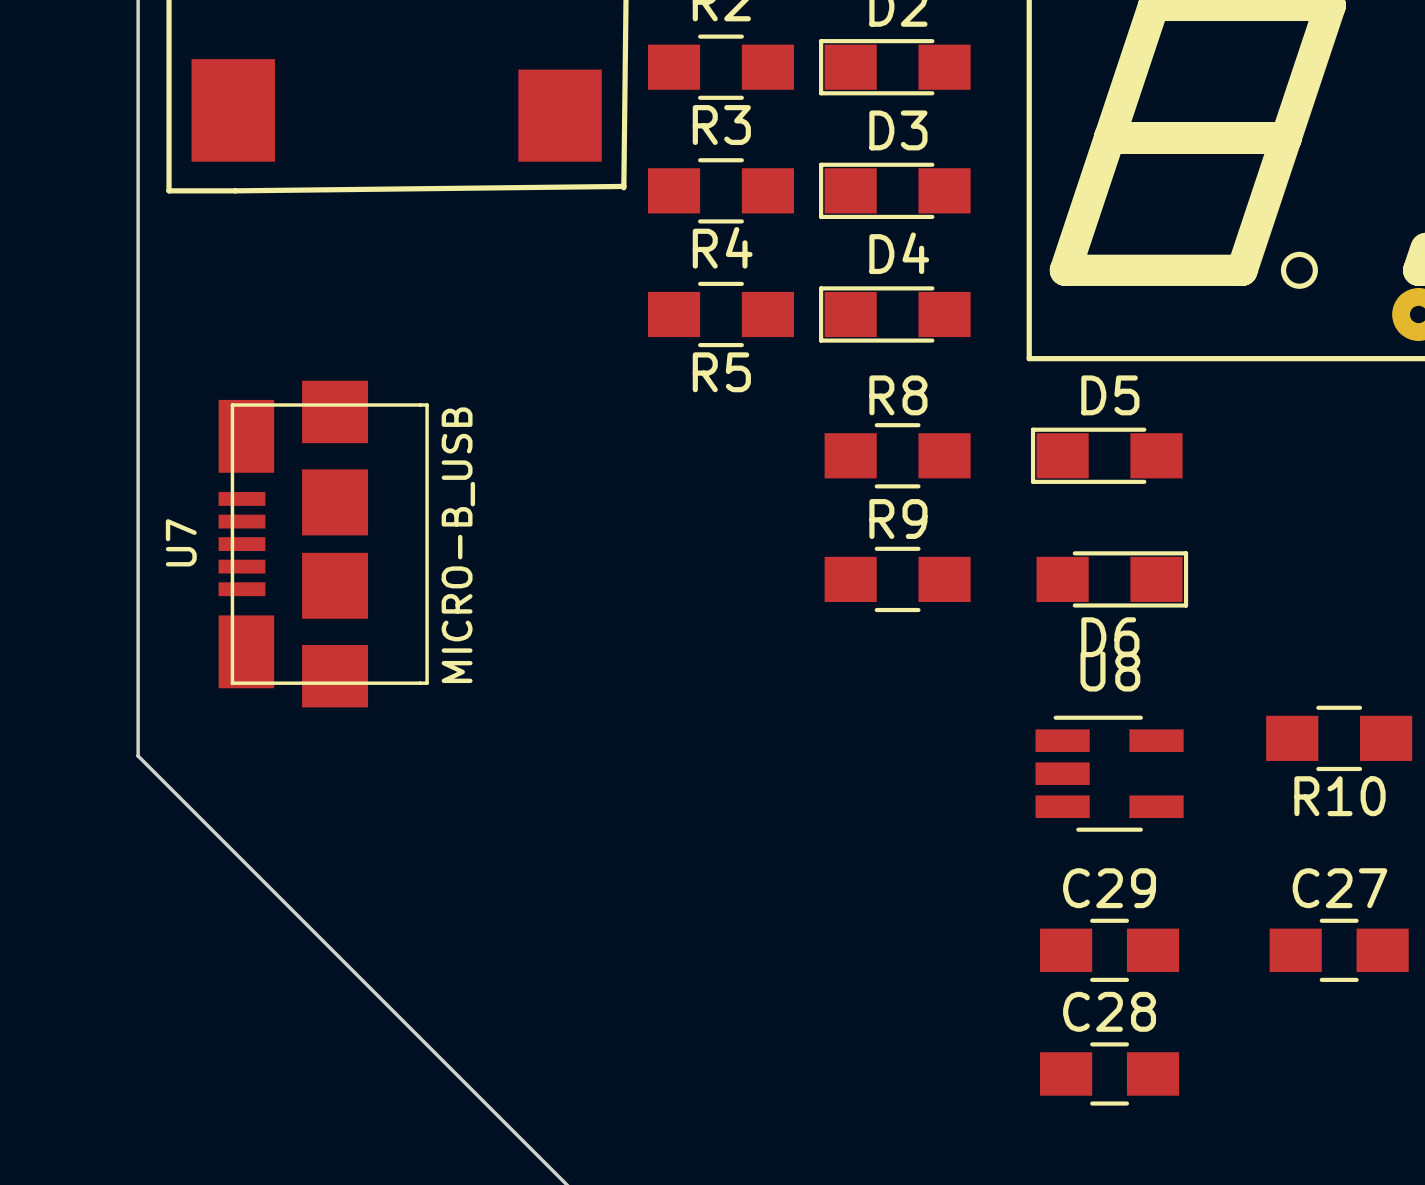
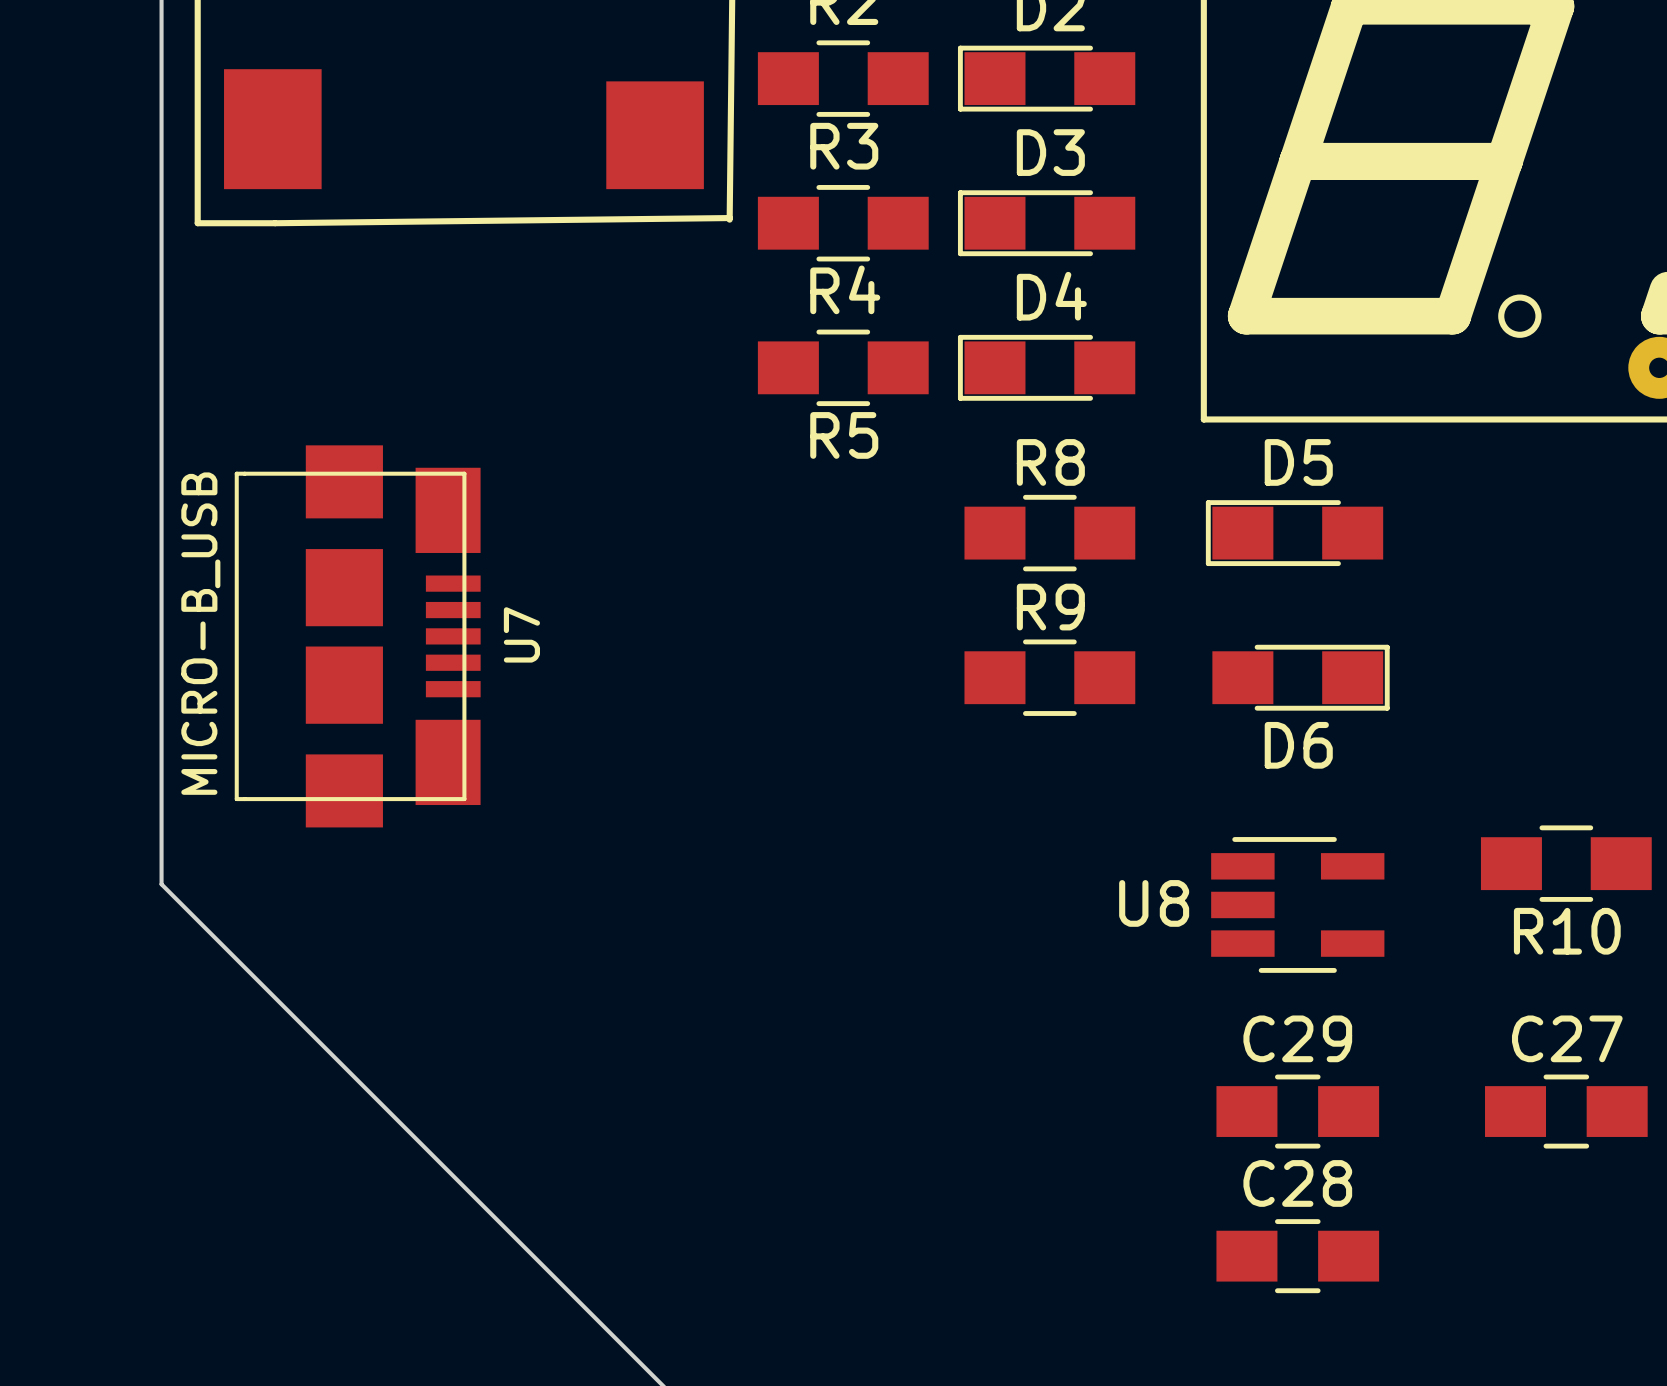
U7 rotation: 0° (323, 544) -> 180° (357, 636)
U8 name position: U8 (1110, 671) -> U8 (1154, 903)

